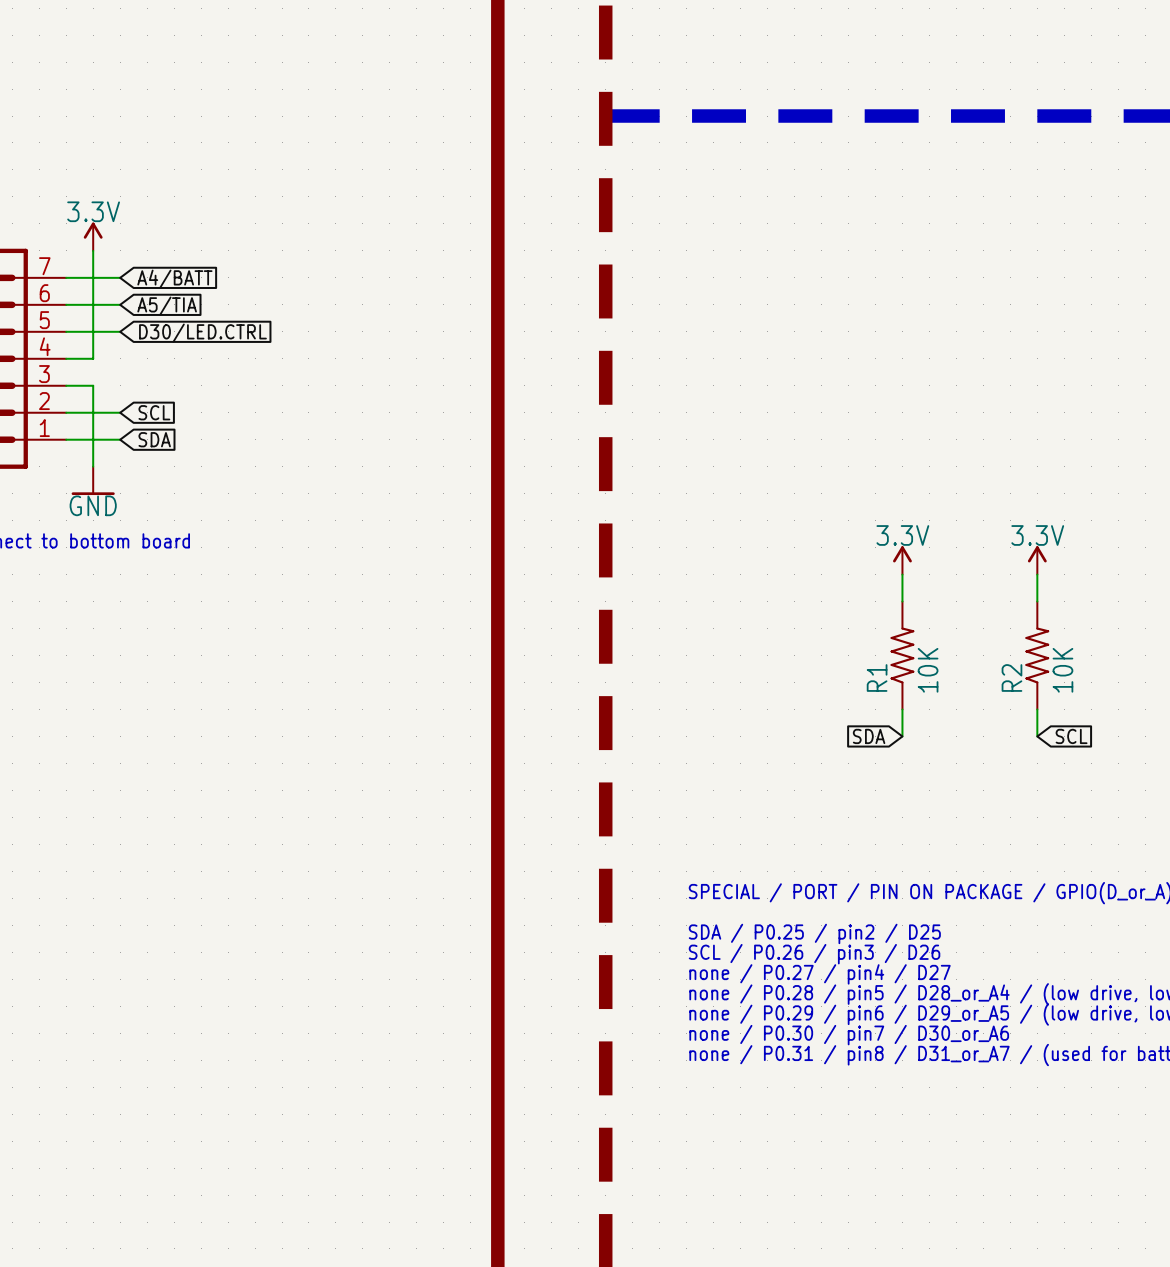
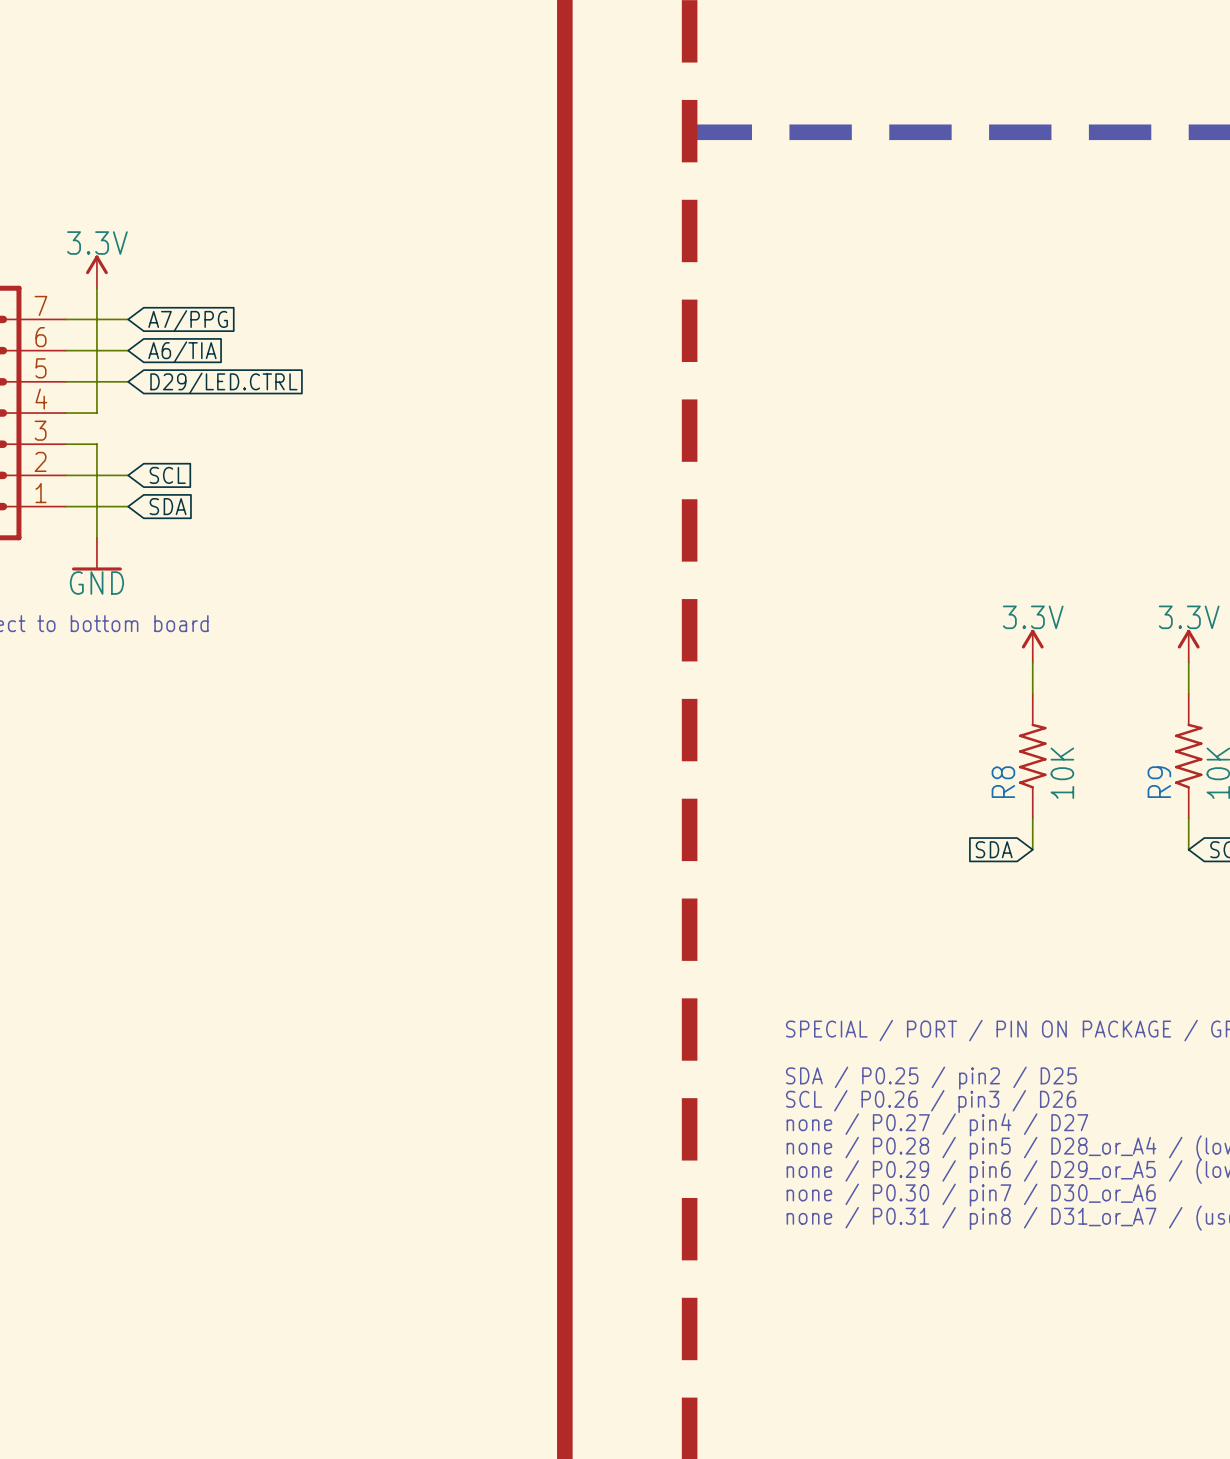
global label: A4/BATT (174, 279) -> A7/PPG (188, 320)
global label: A5/TIA (167, 306) -> A6/TIA (182, 352)
global label: D30/LED.CTRL (202, 333) -> D29/LED.CTRL (223, 383)
R1 name: R1 (877, 678) -> R8 (1003, 782)
R2 name: R2 (1011, 678) -> R9 (1159, 782)

